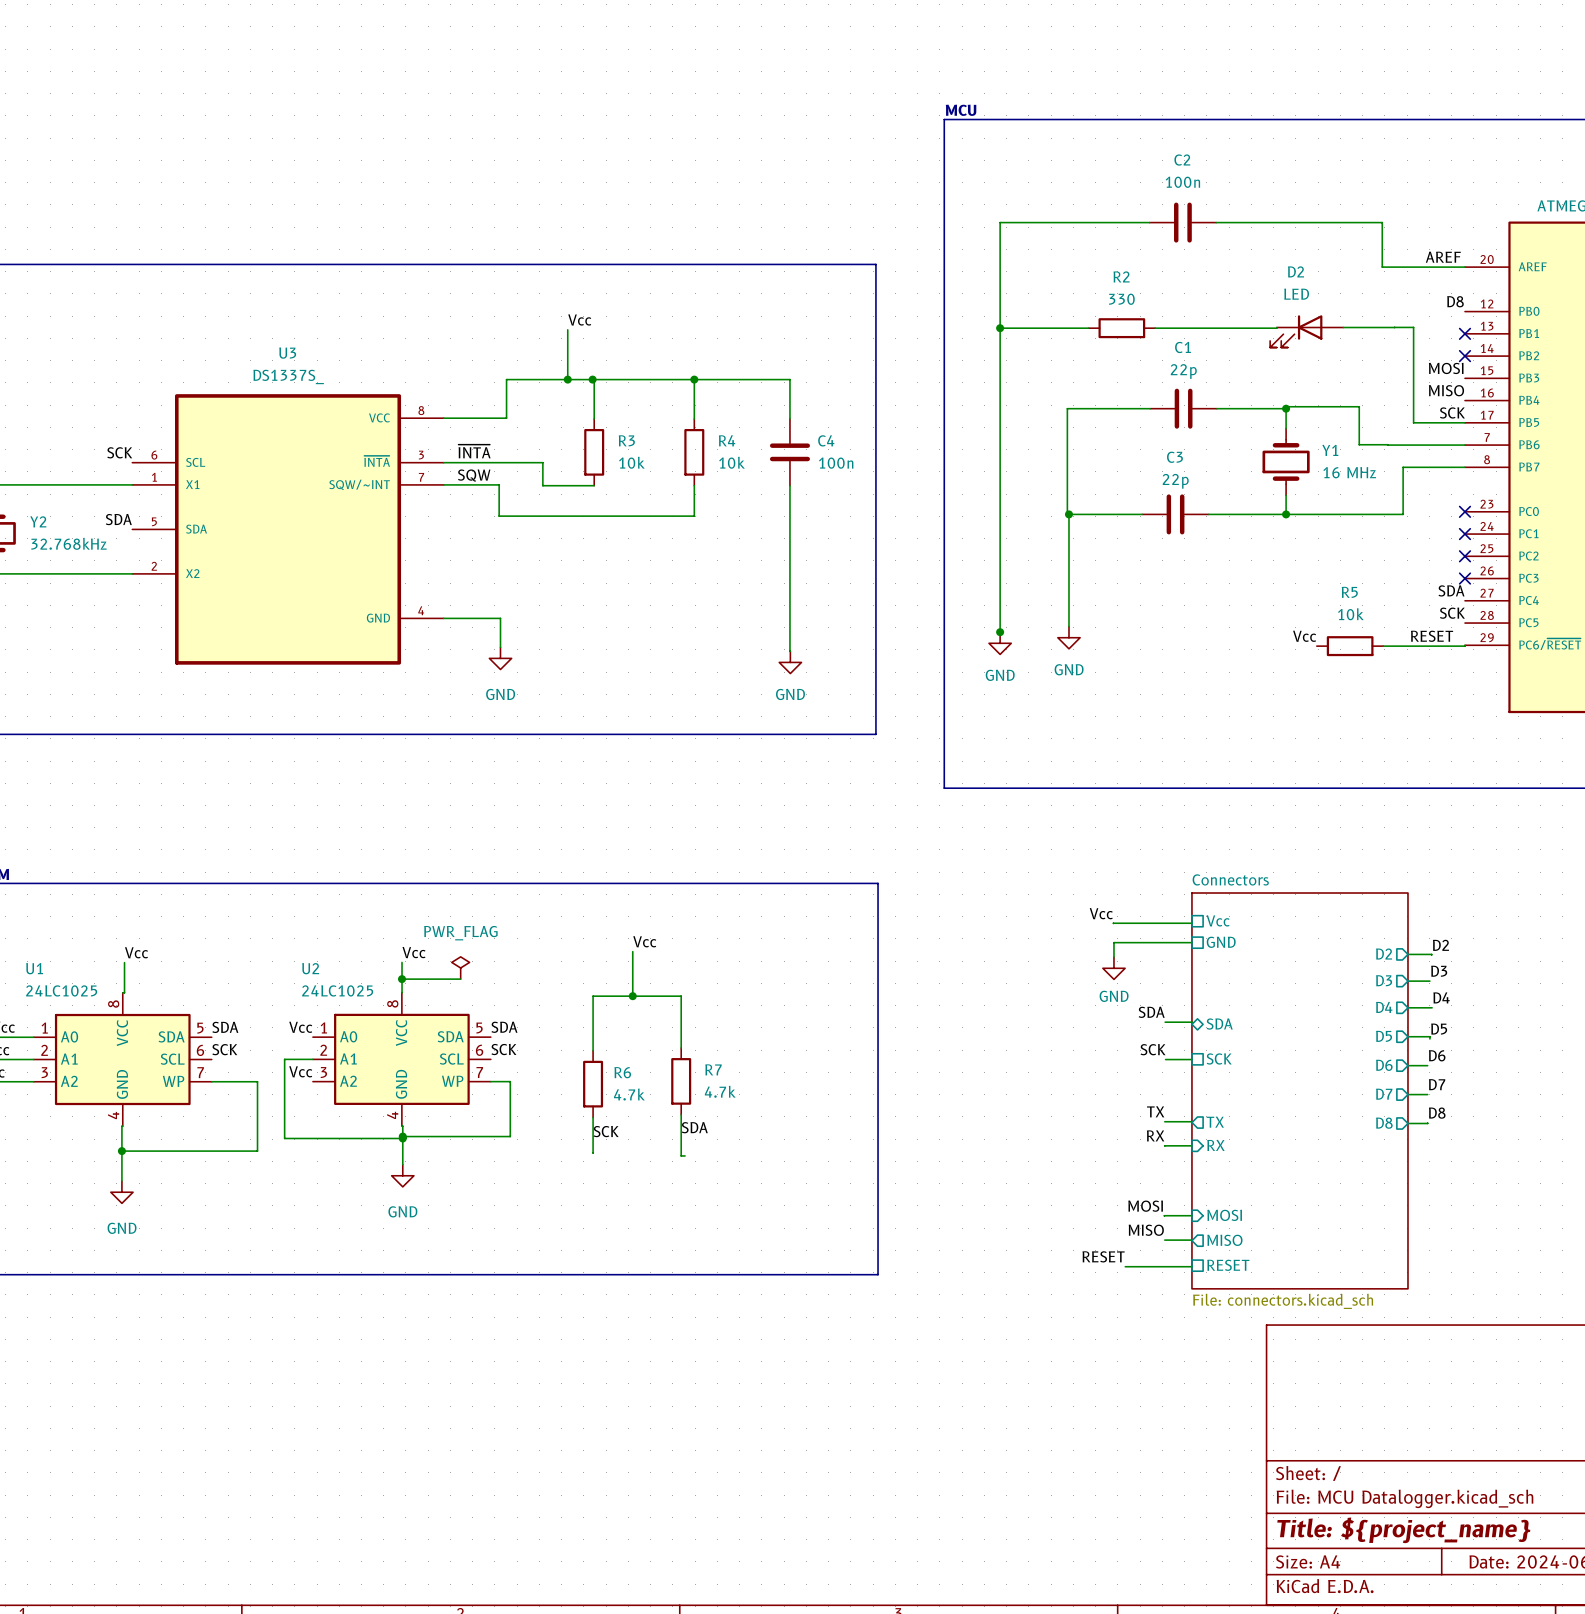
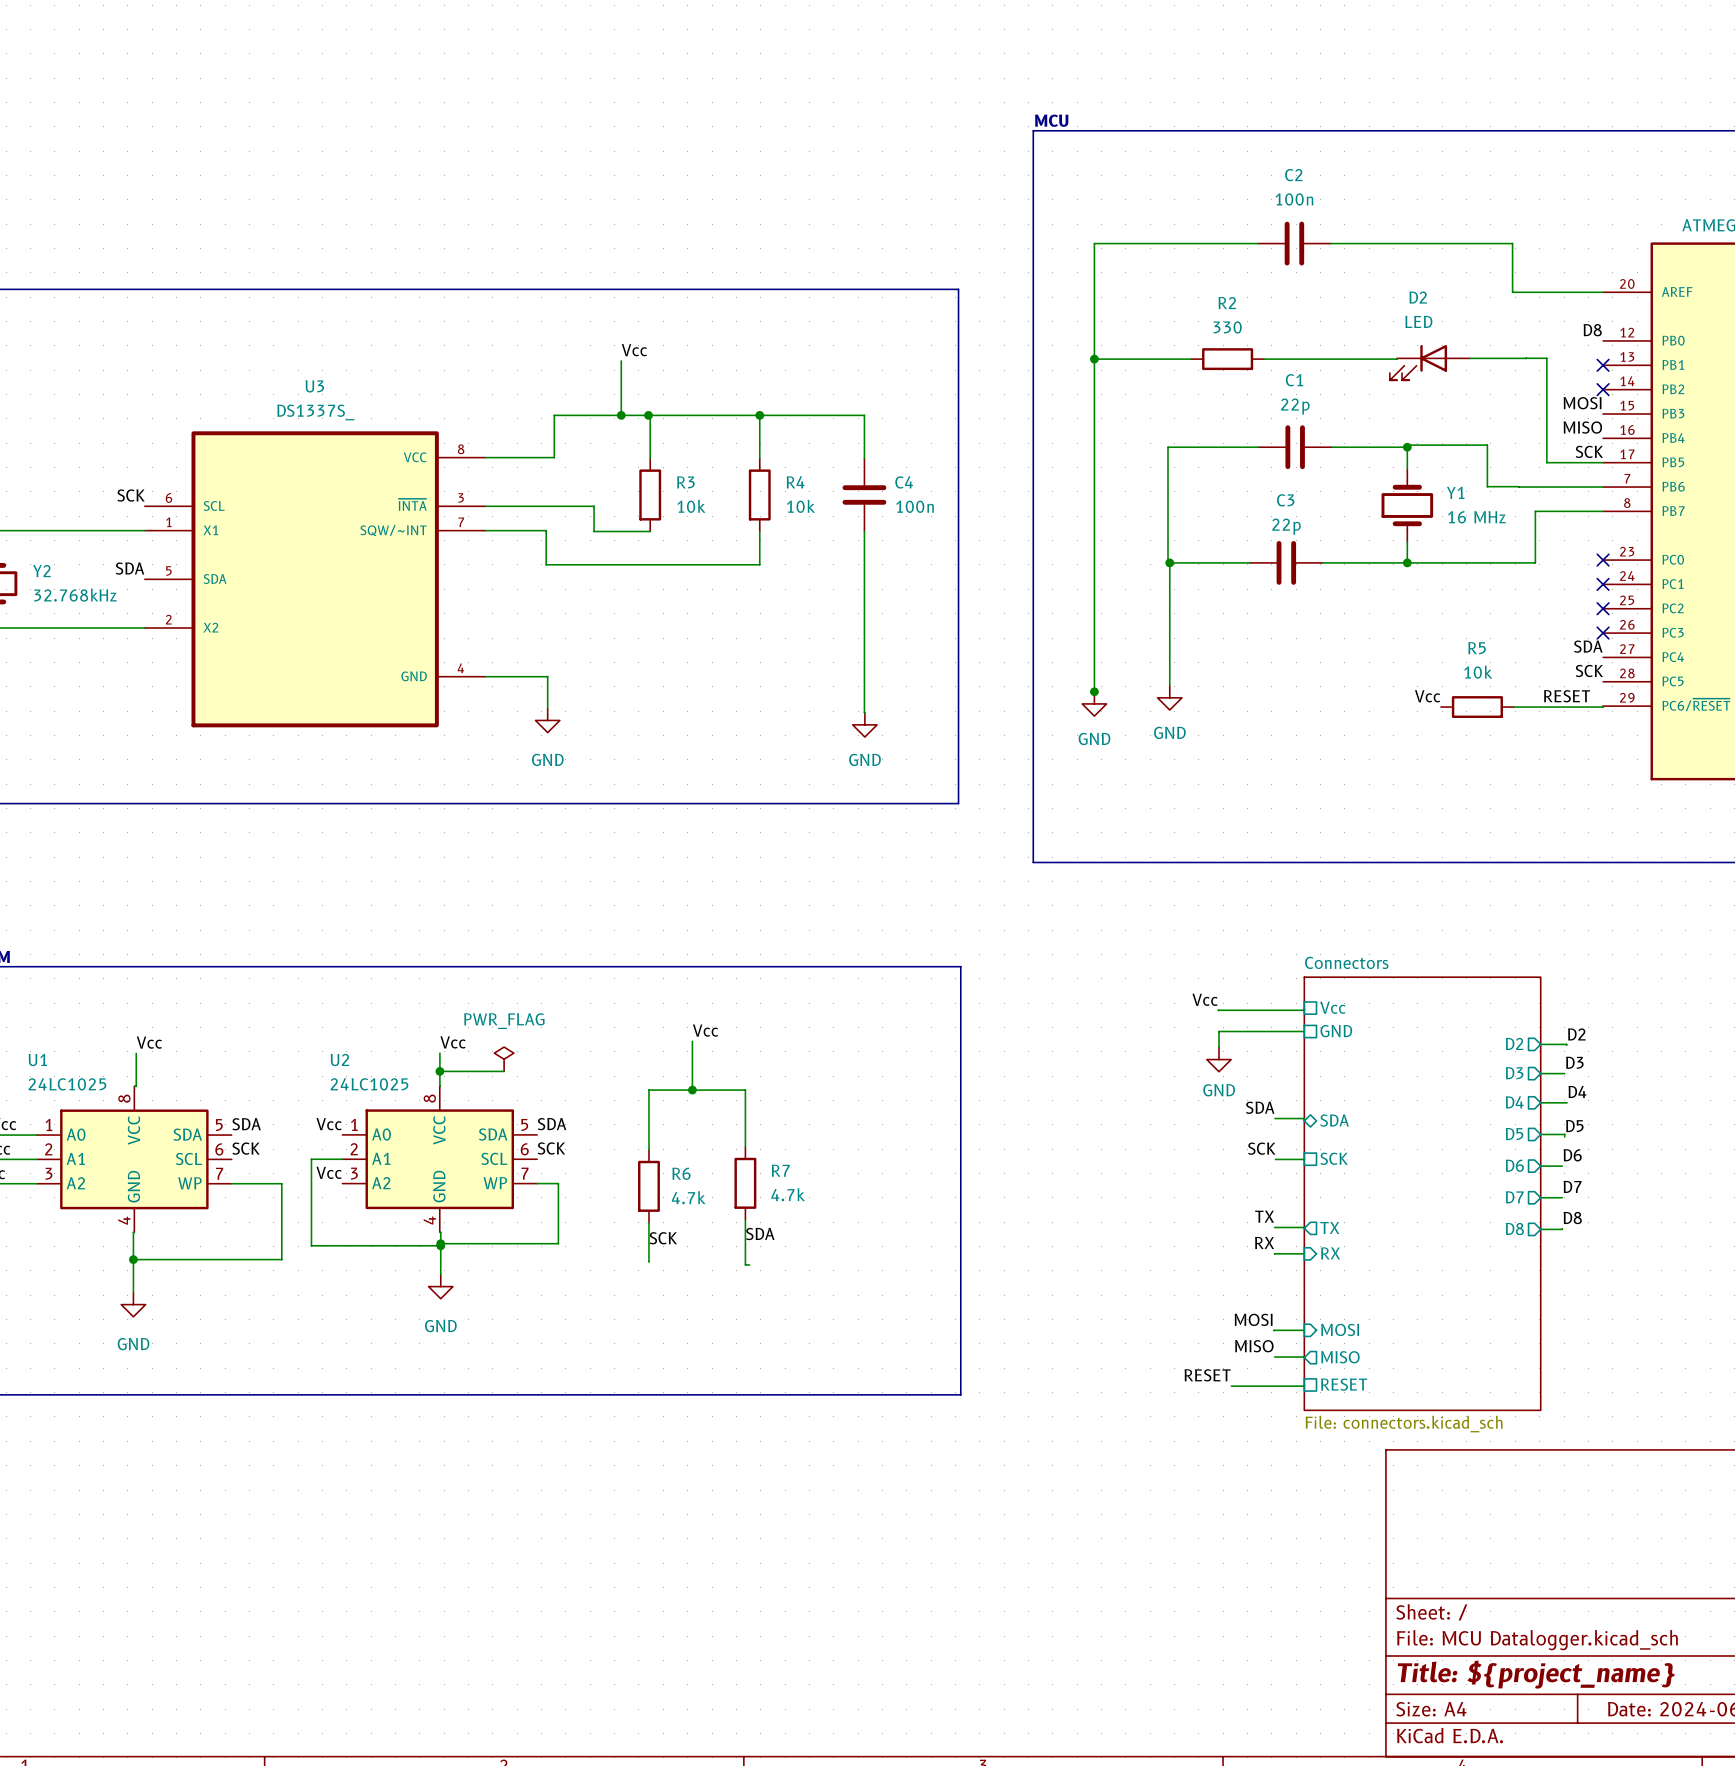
label: AREF (1443, 257) -> none
label: ~{INTA} (474, 451) -> none
label: SQW (474, 475) -> none

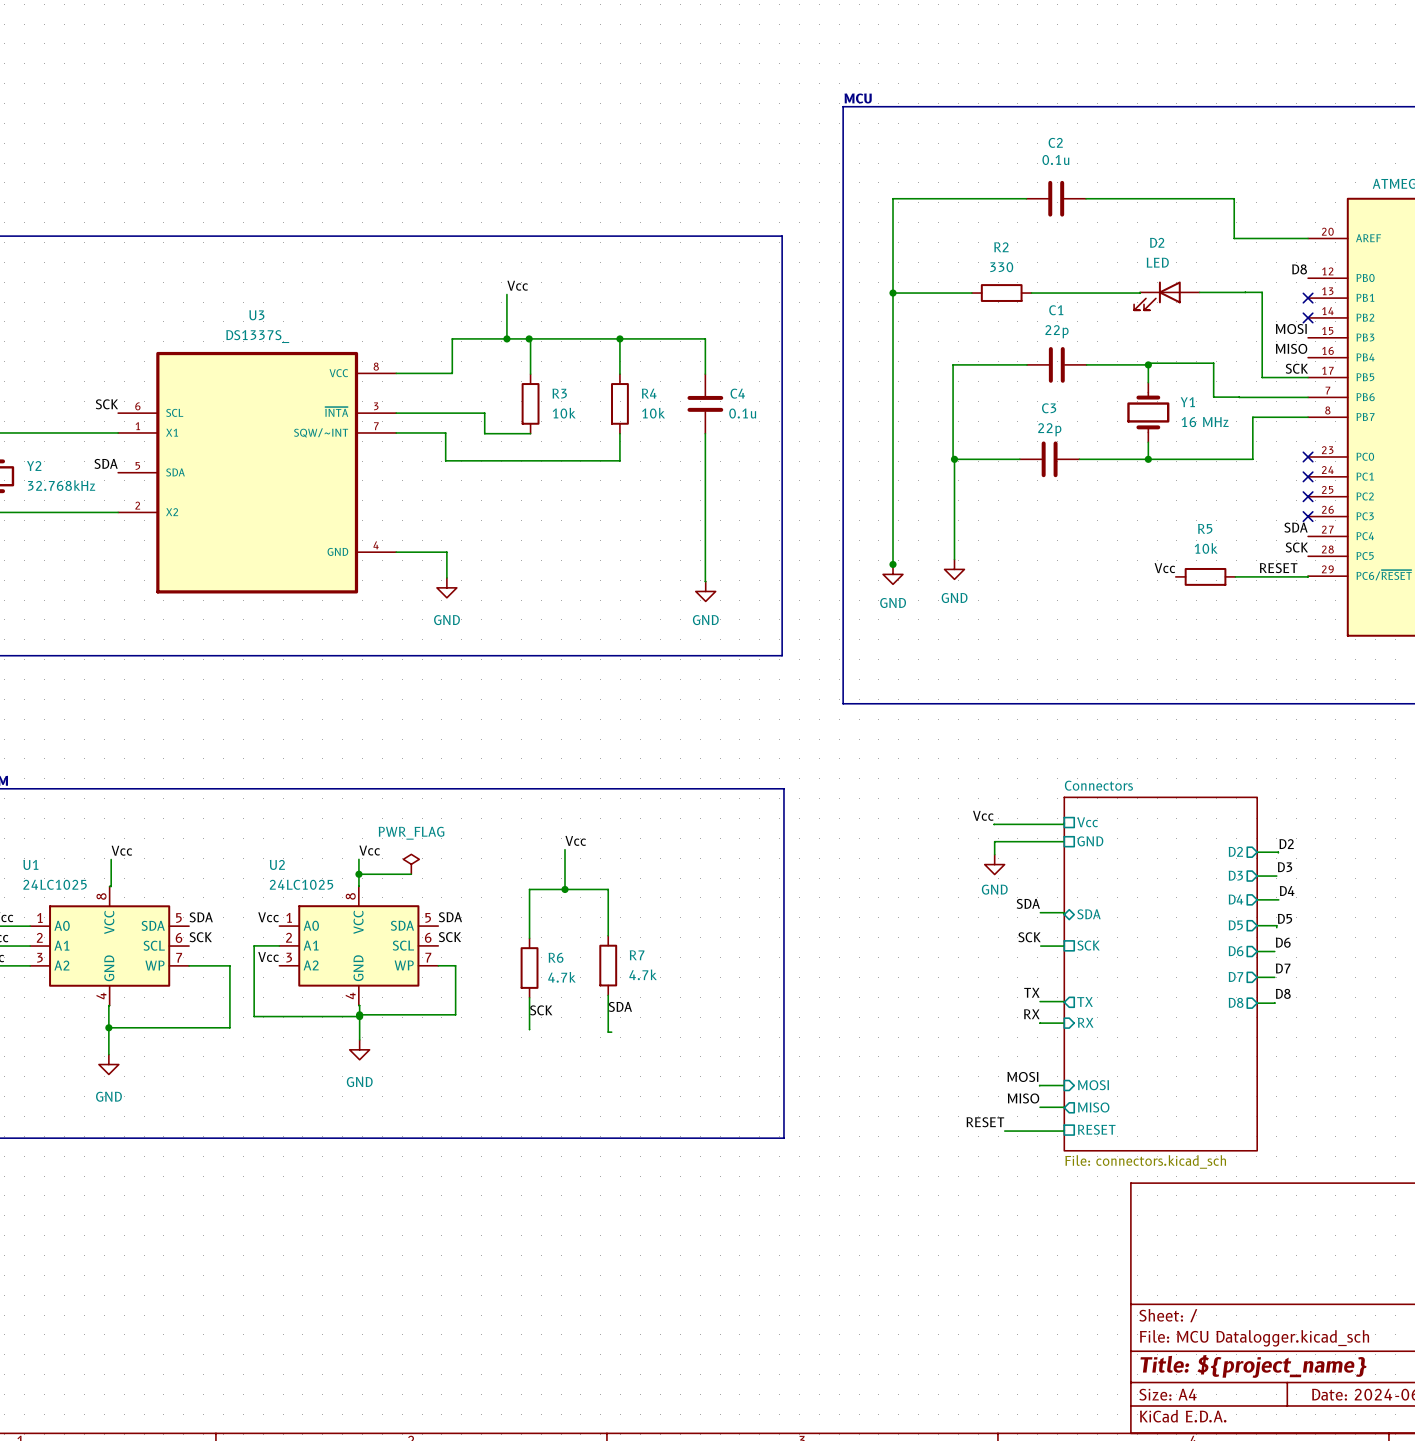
C2 value: 100n (1294, 199) -> 0.1u (1055, 160)
C4 value: 100n (915, 506) -> 0.1u (742, 413)

